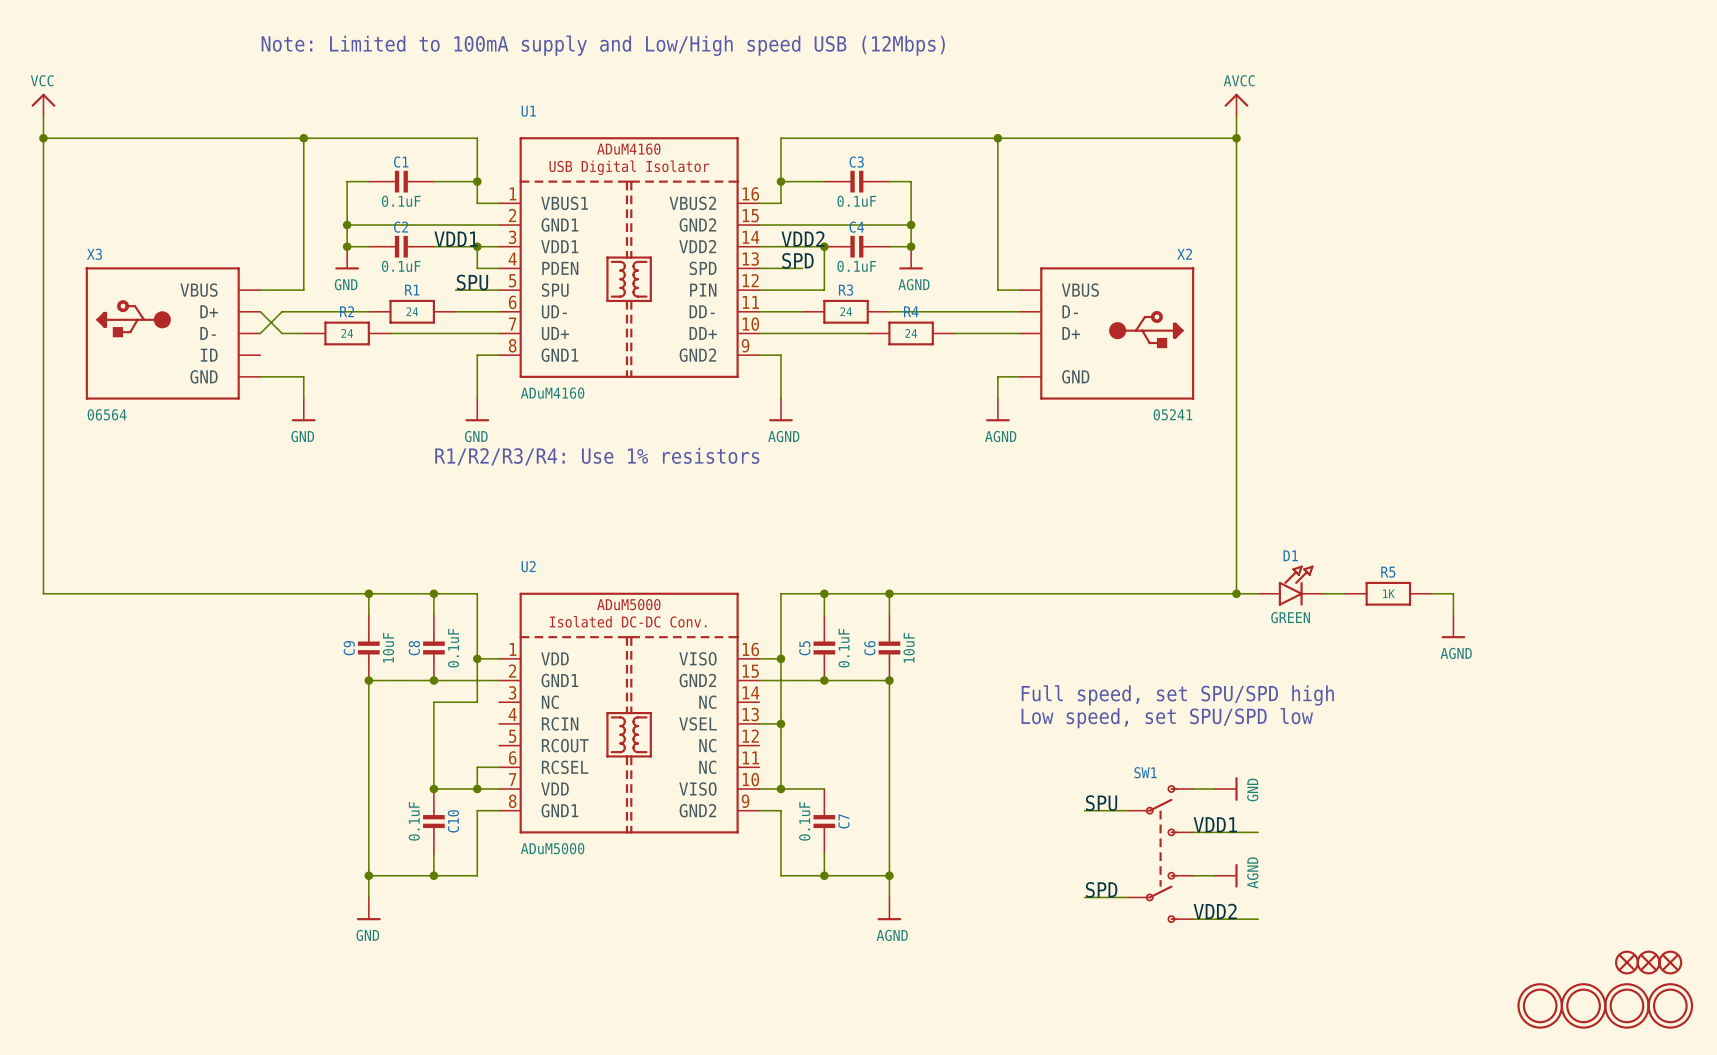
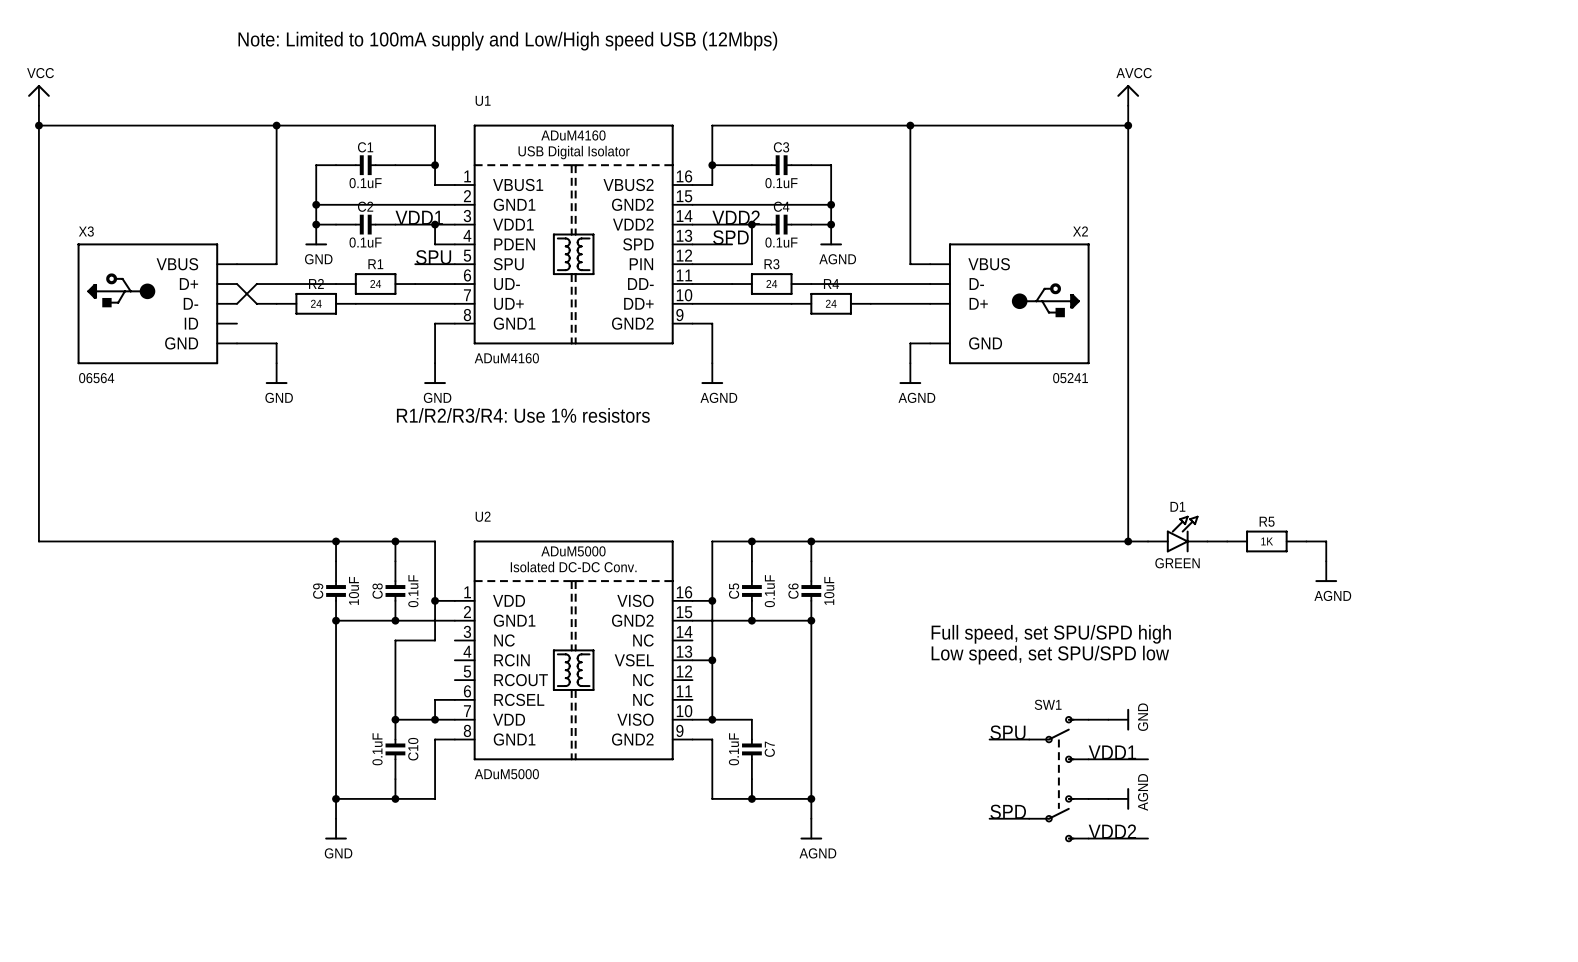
part: (1626, 962) -> none
part: (1648, 962) -> none
part: (1670, 962) -> none
part: (1540, 1005) -> none
part: (1583, 1005) -> none
part: (1626, 1005) -> none
part: (1670, 1005) -> none

